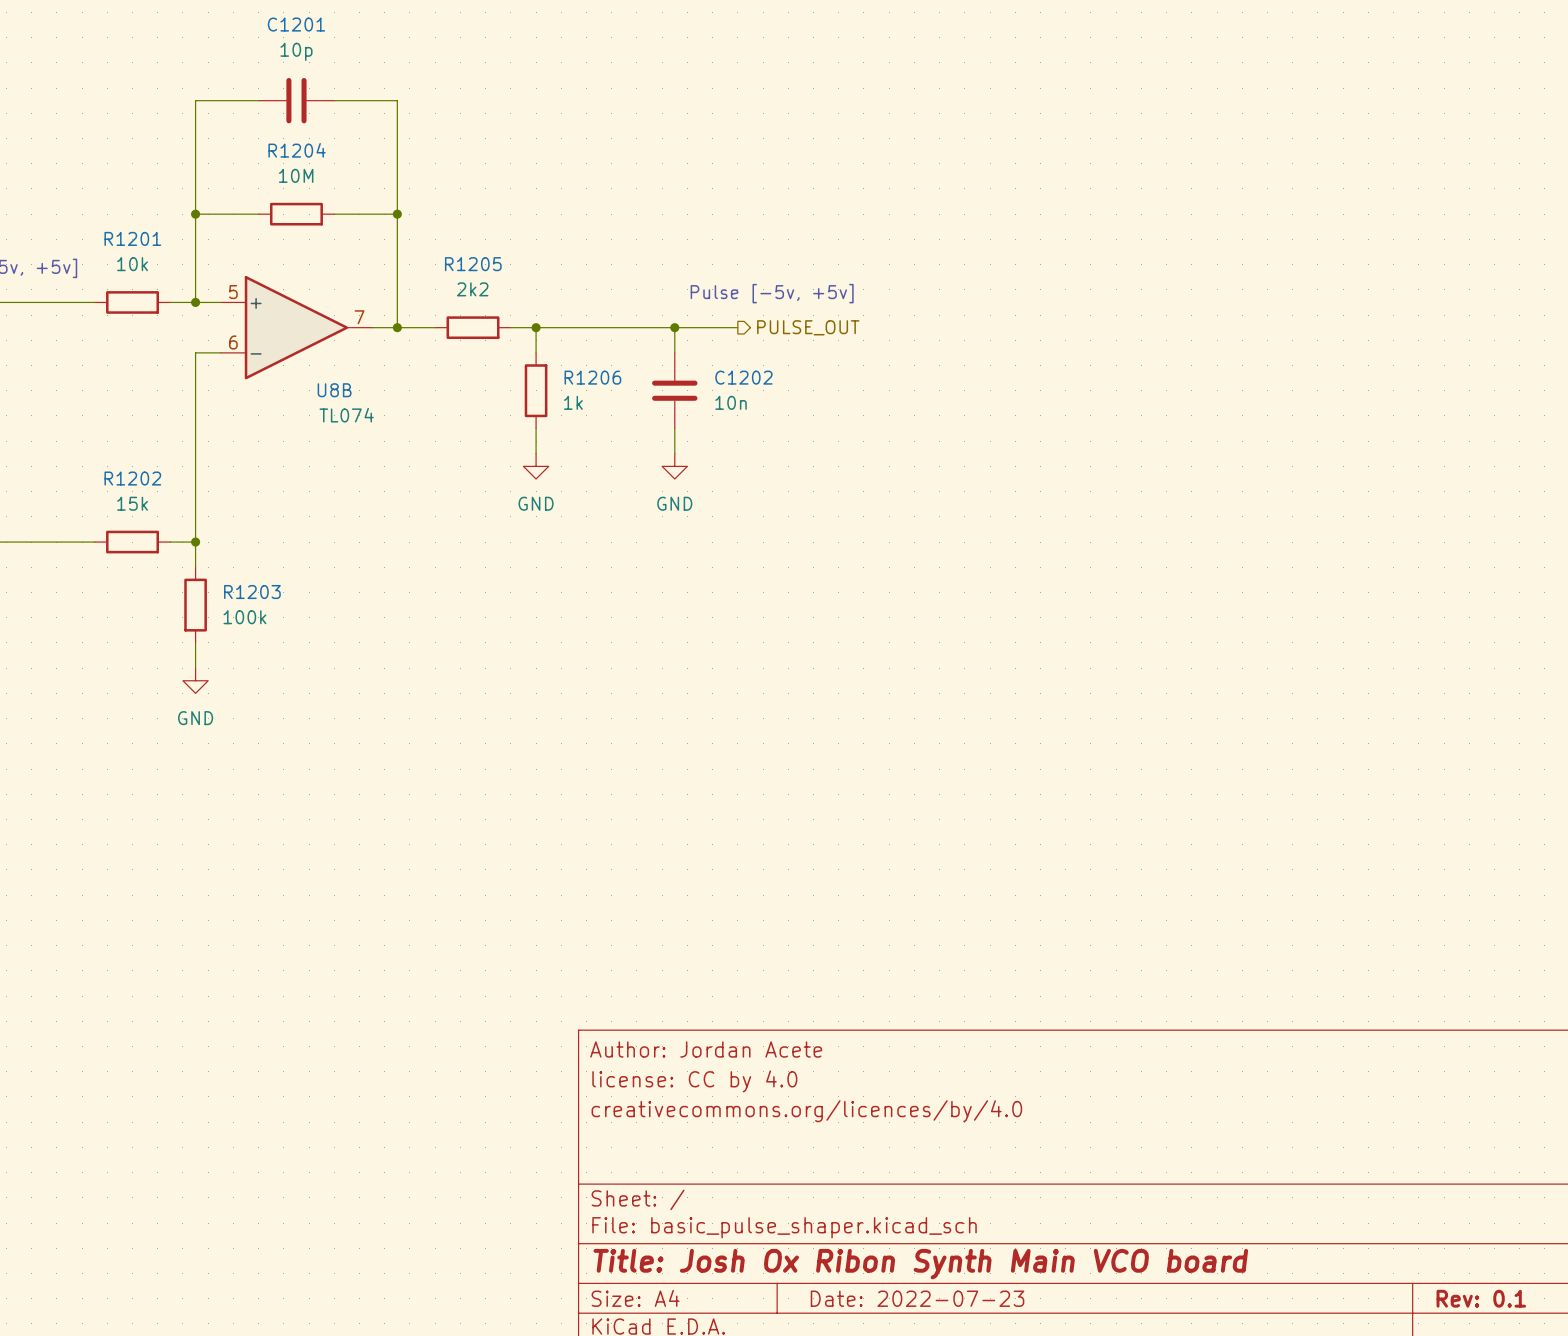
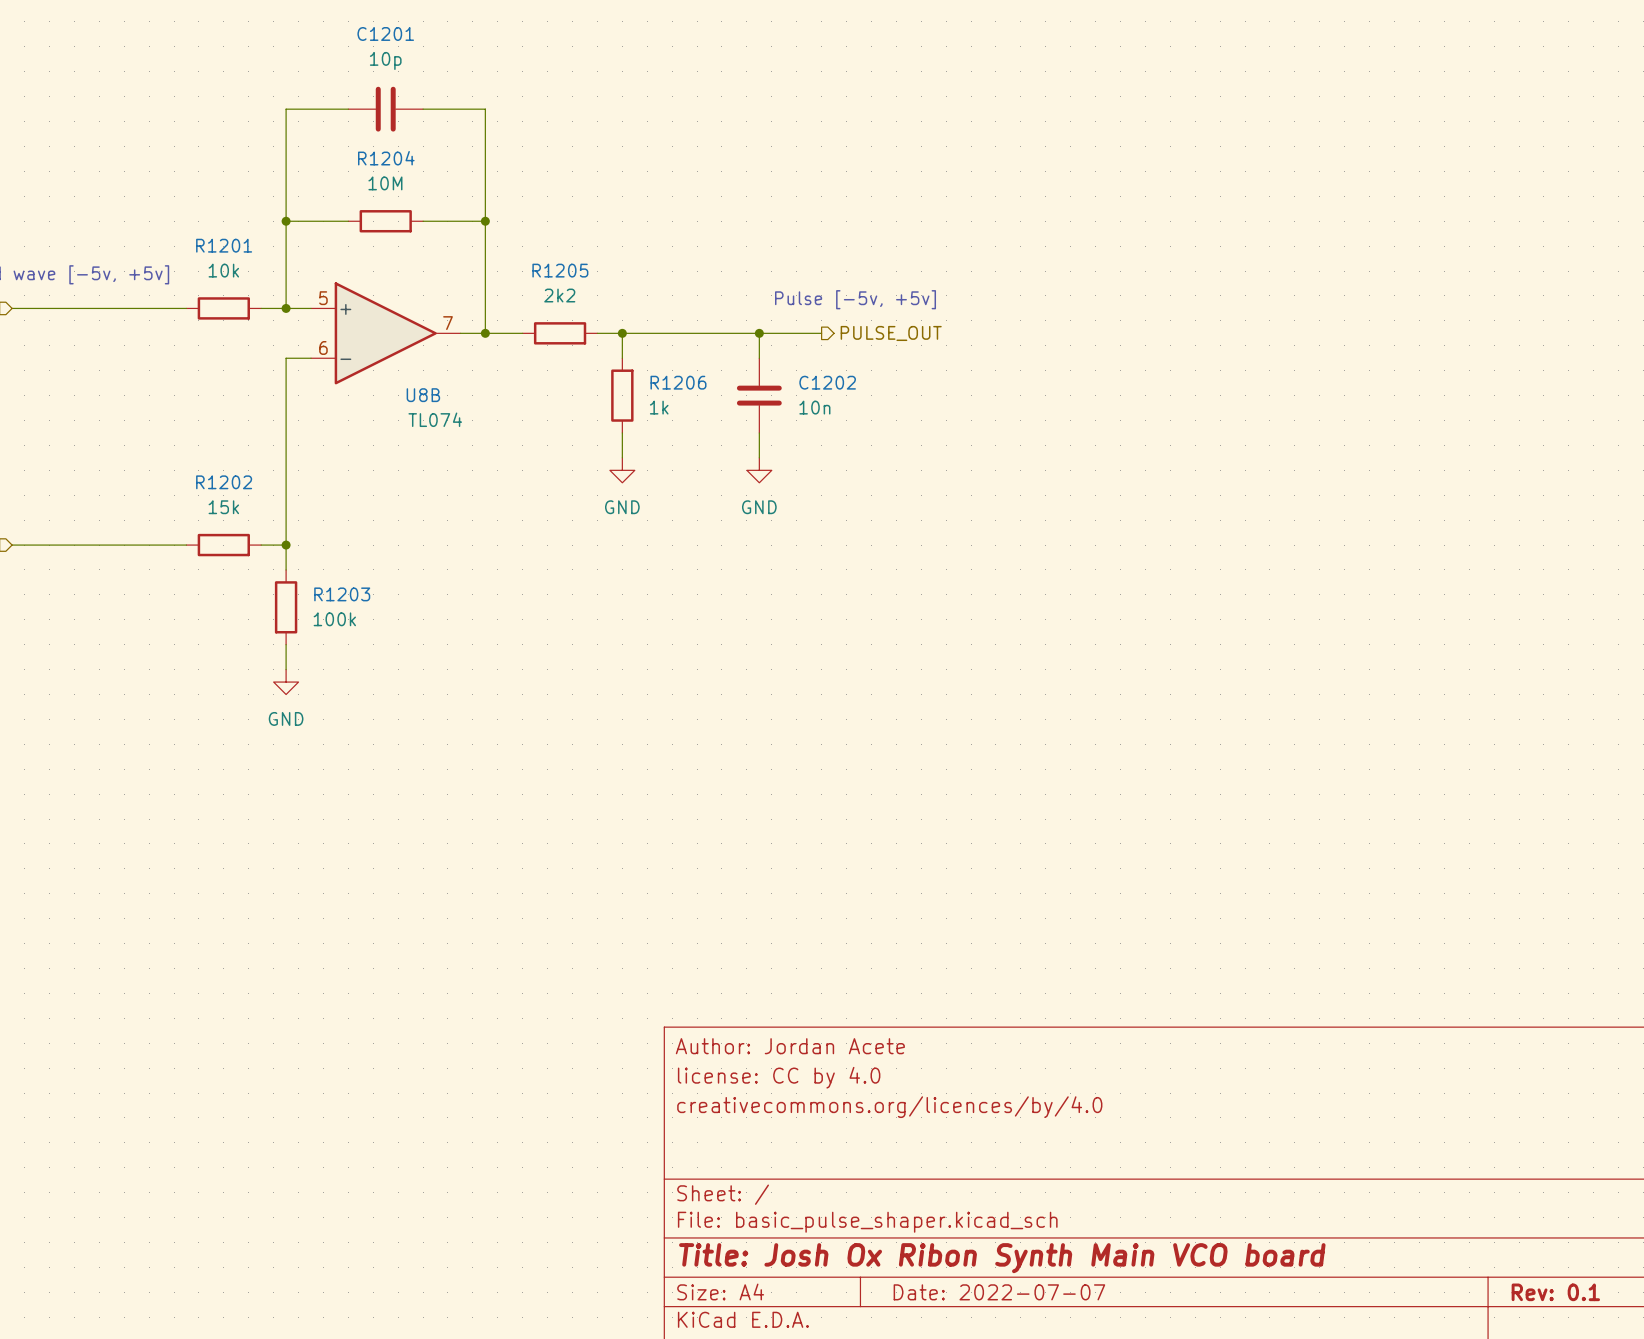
title block: Date: 2022-07-23 (917, 1298) -> Date: 2022-07-07 (999, 1292)

